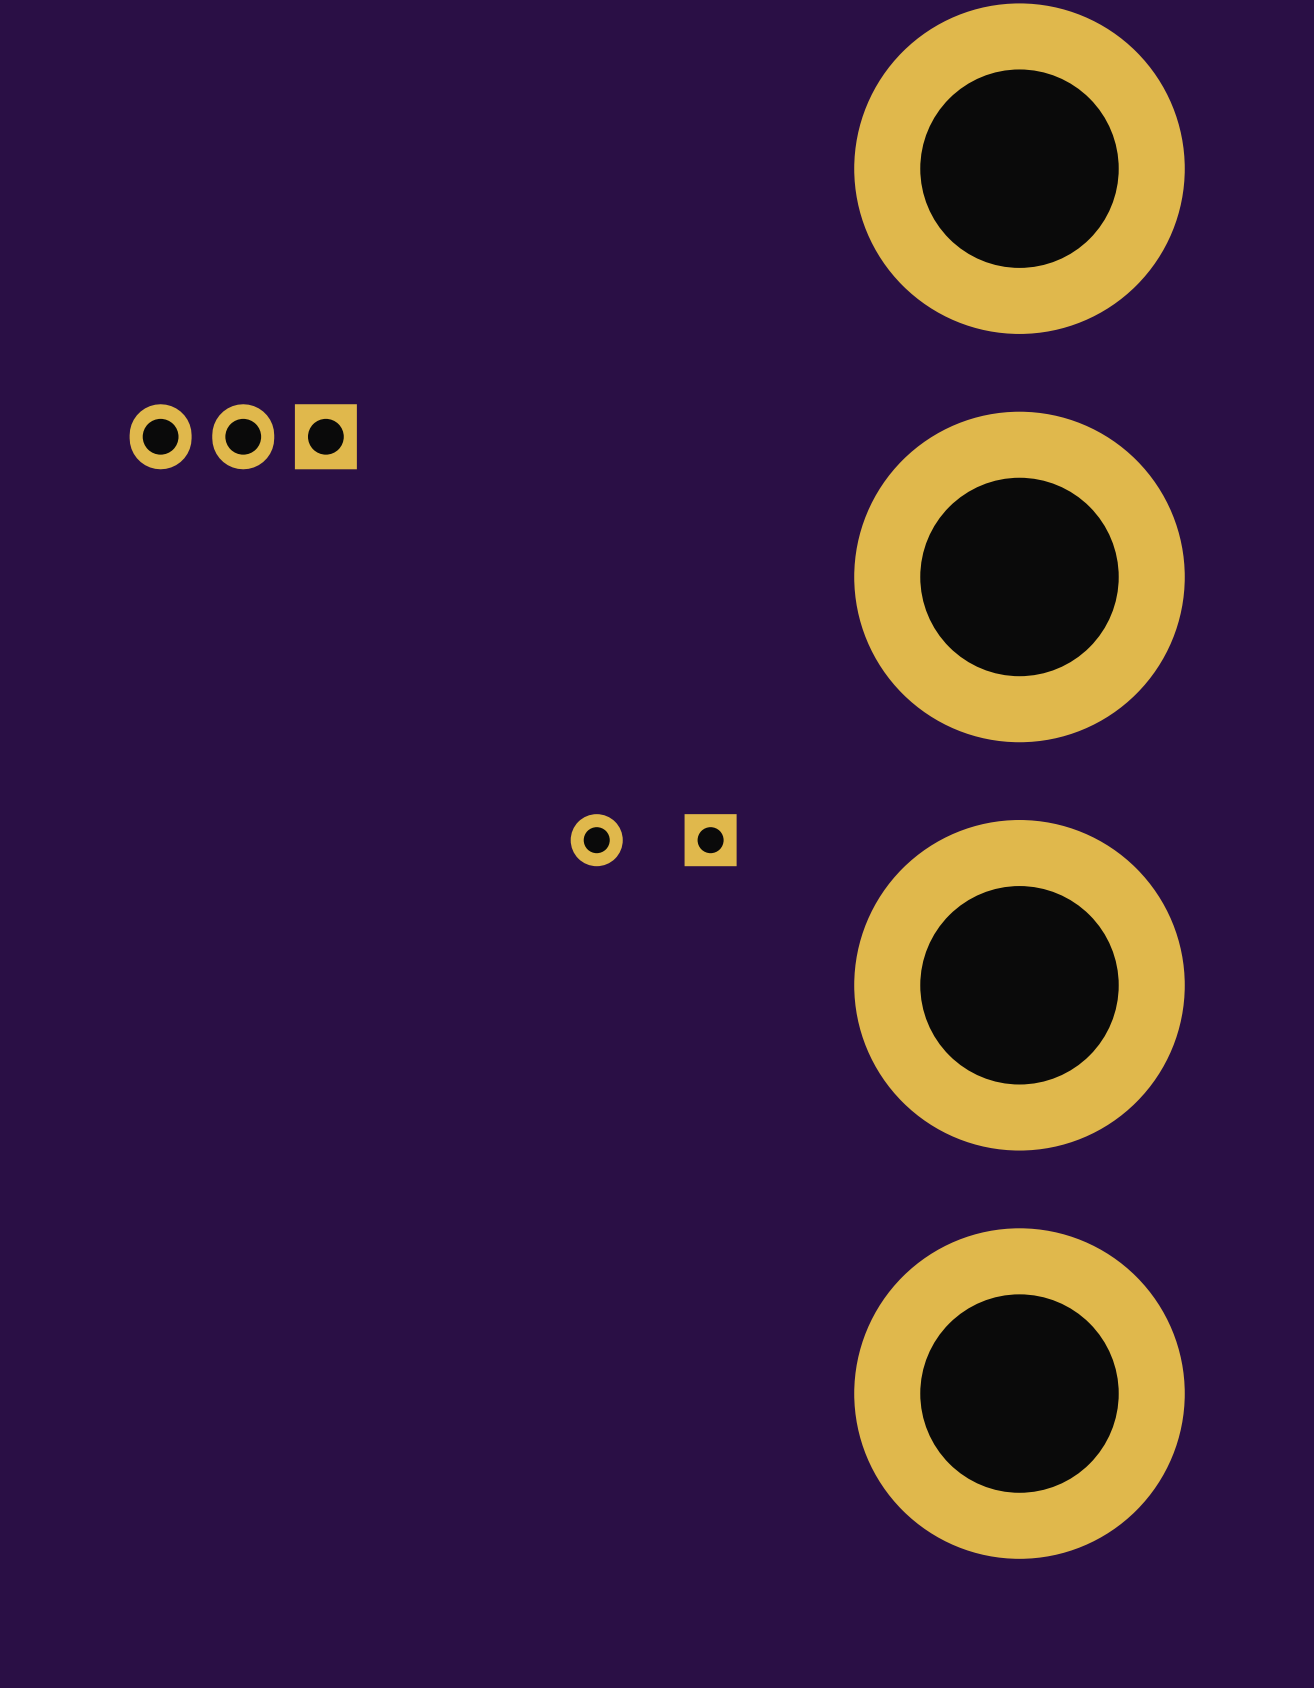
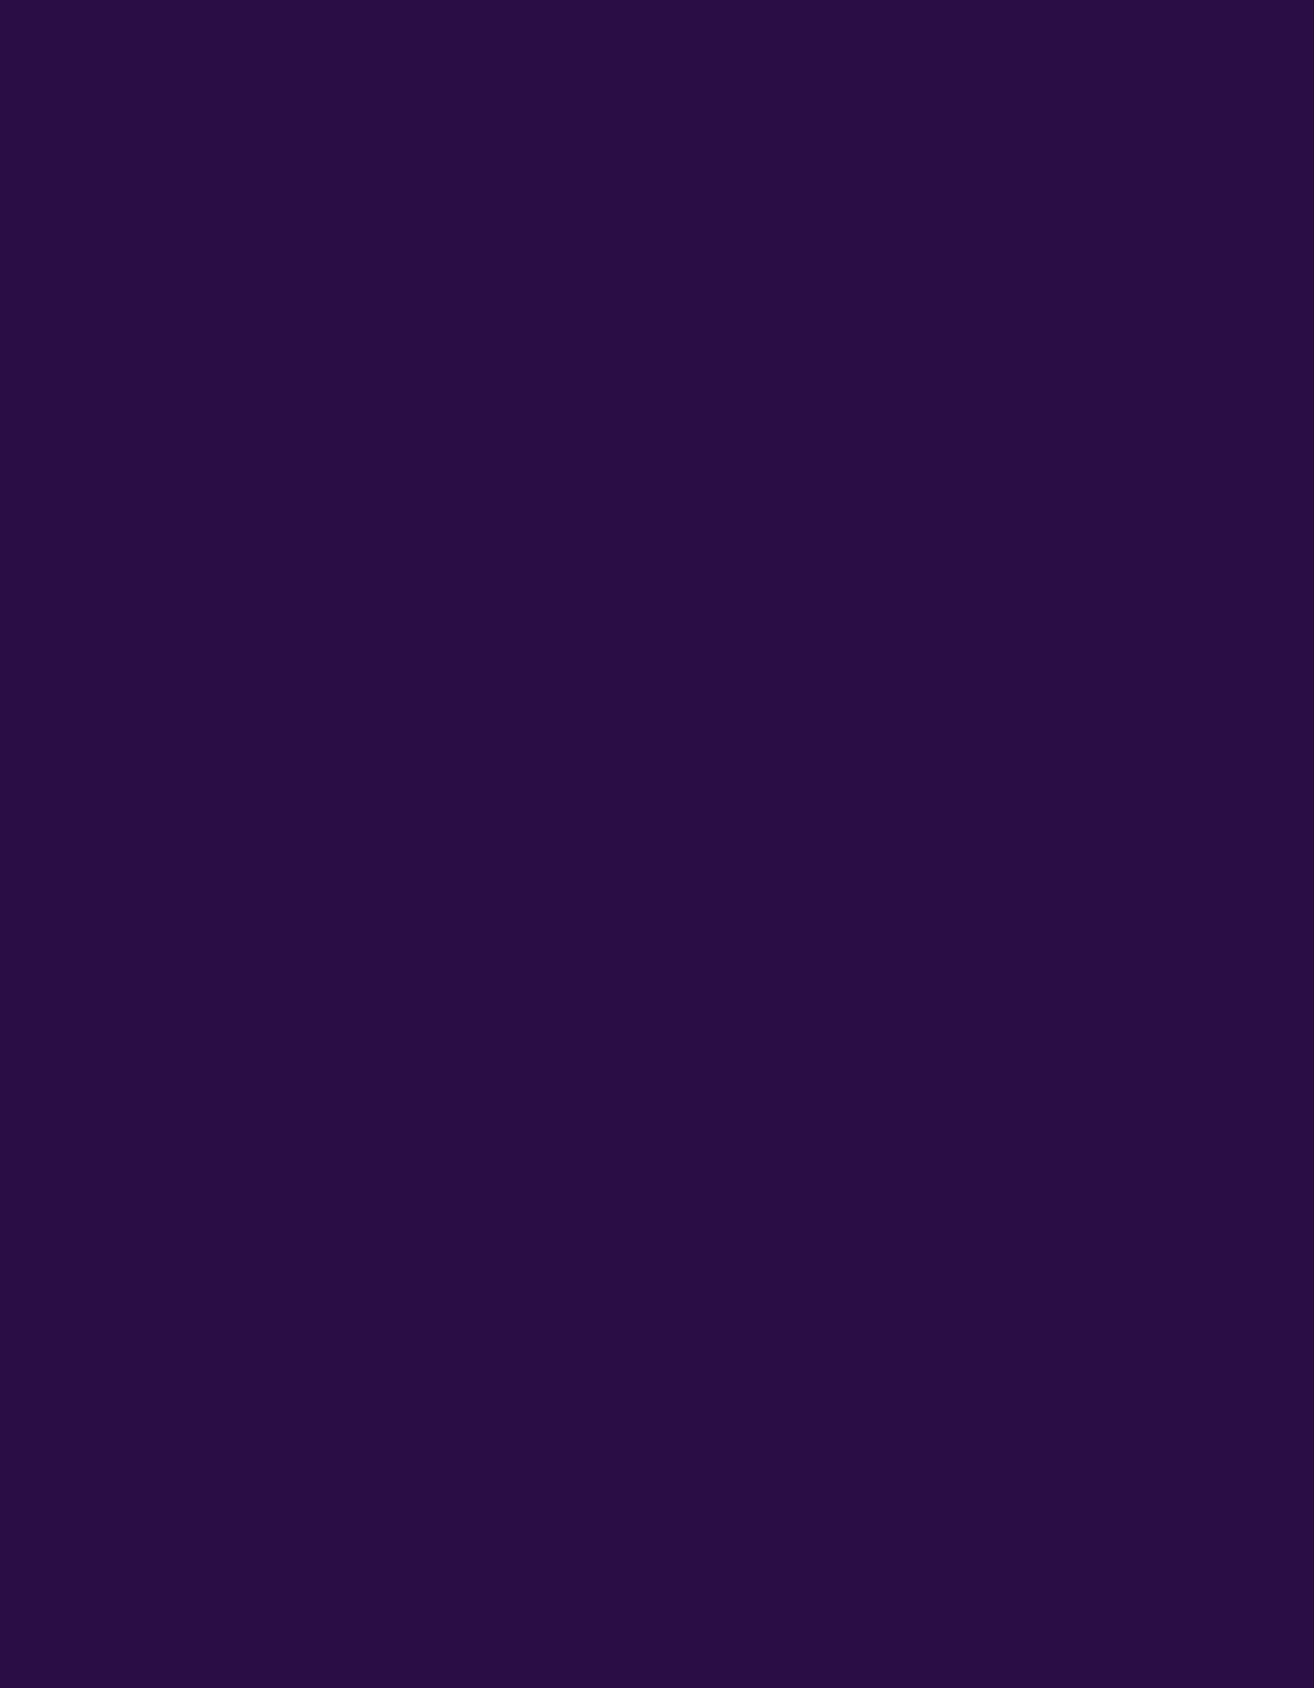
part: (1019, 168) -> none
part: (243, 436) -> none
part: (1019, 576) -> none
part: (653, 840) -> none
part: (1019, 985) -> none
part: (1019, 1393) -> none

